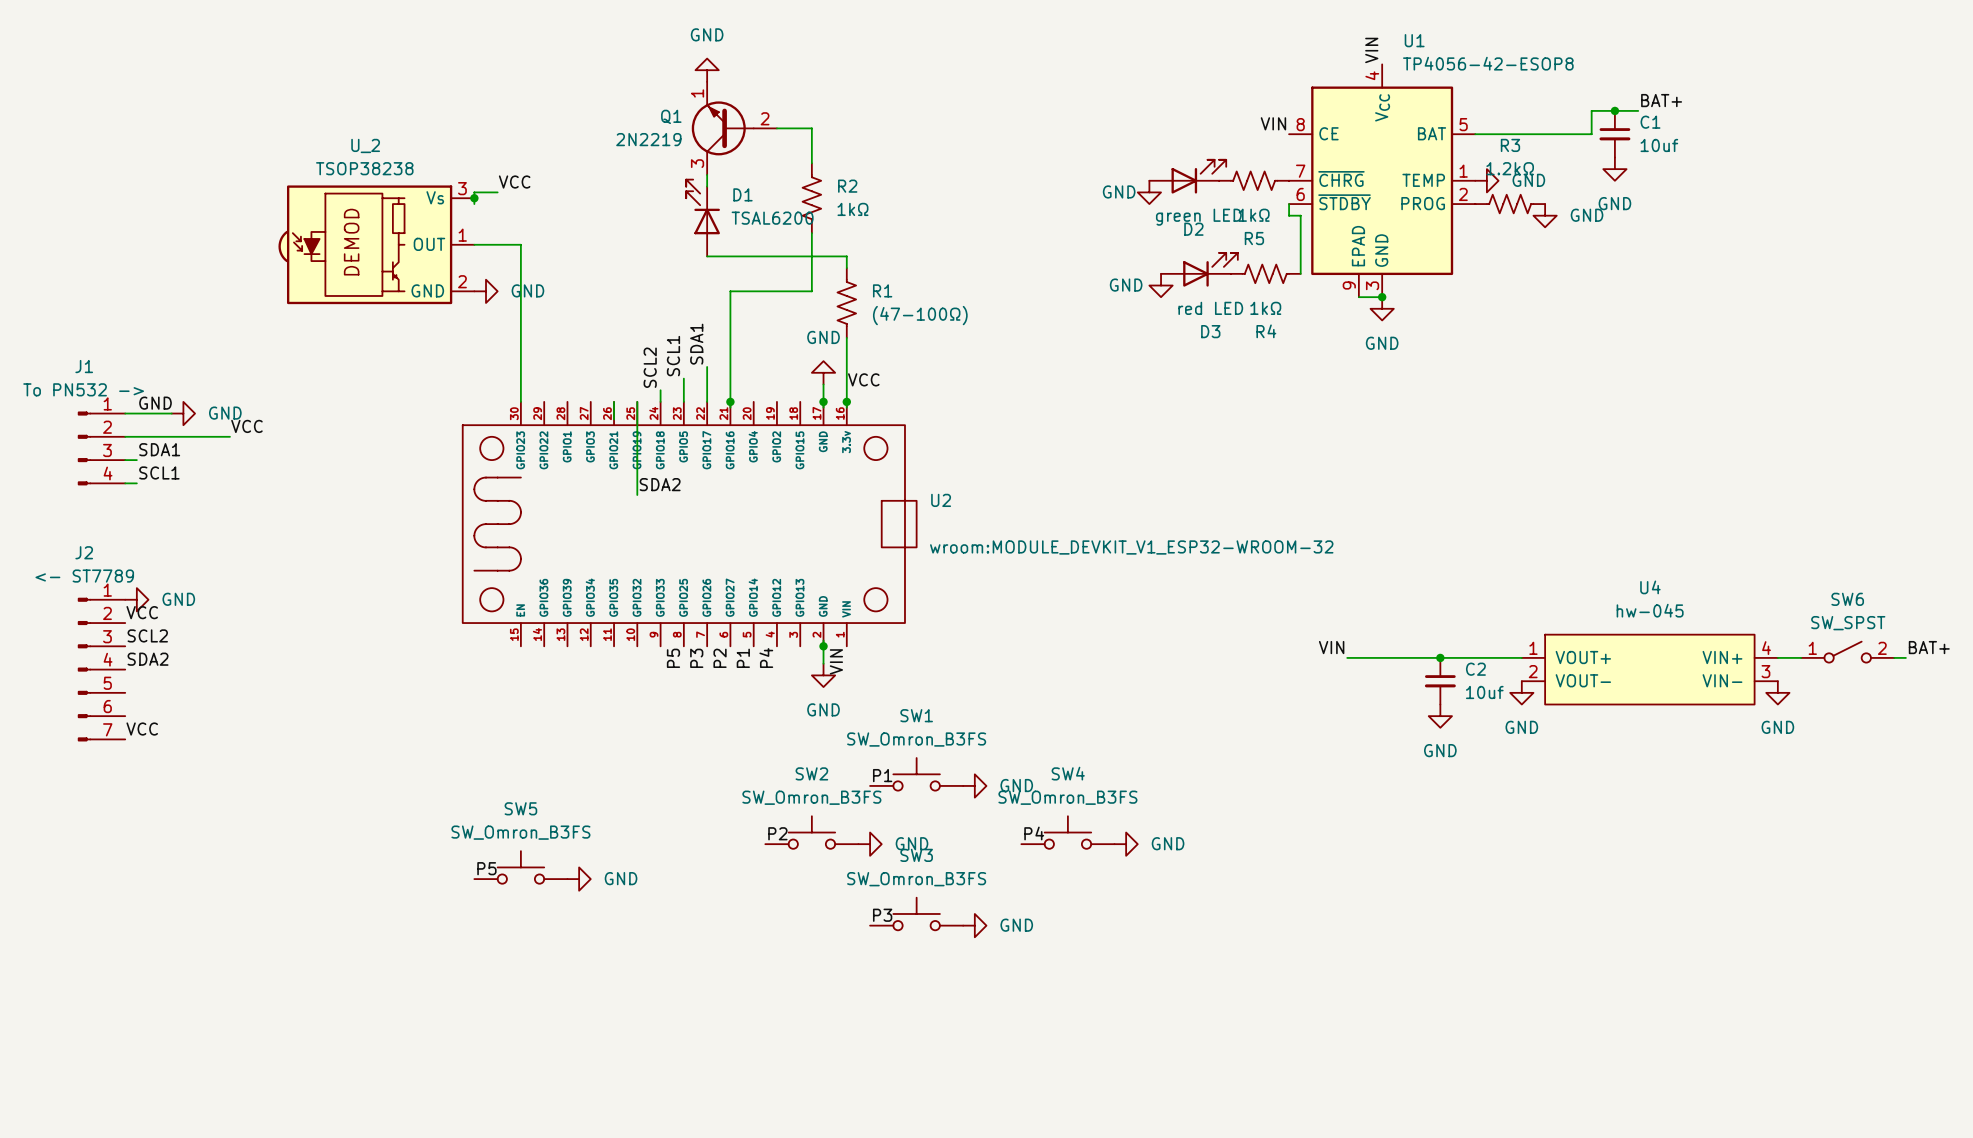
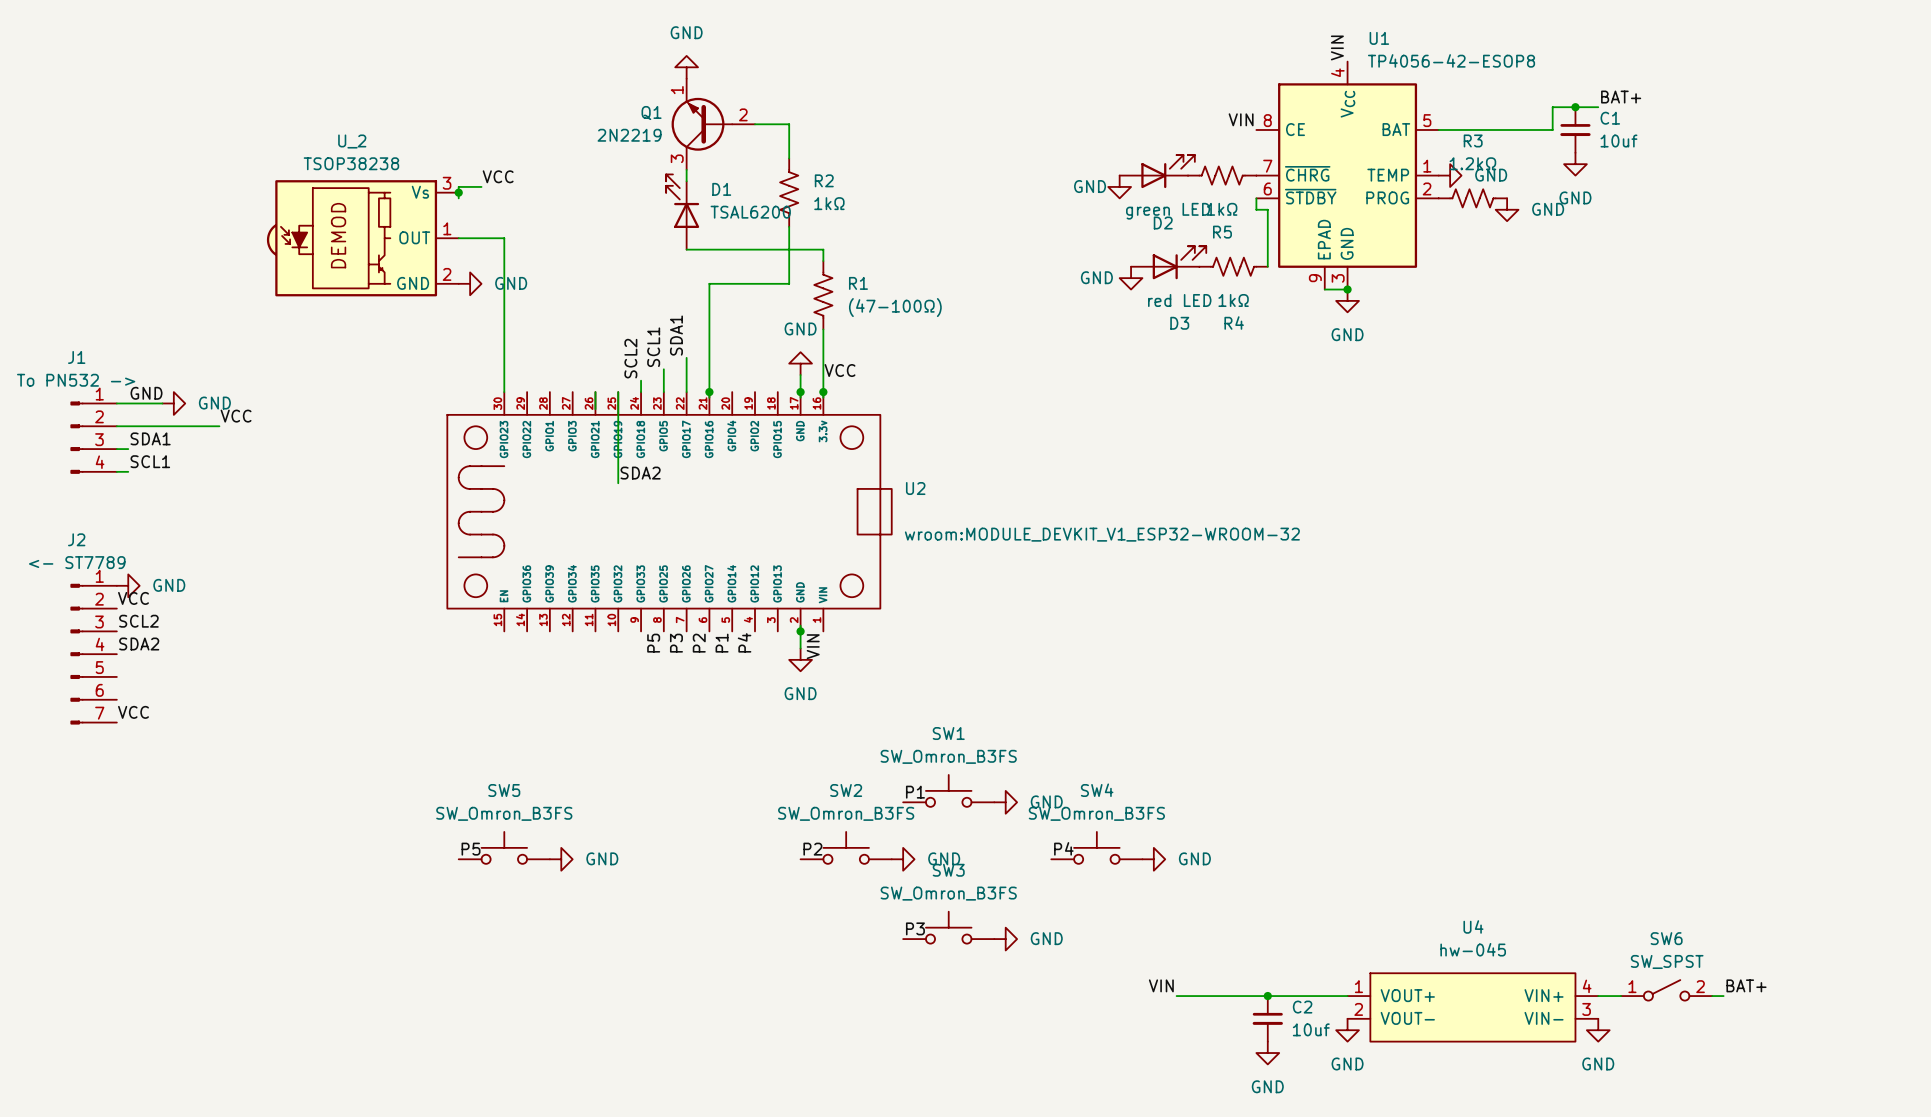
label: VIN (1331, 647) -> none
label: BAT+ (1929, 647) -> none
SW6 position: (1847, 652) -> (1666, 990)
wire: (1347, 657) (1521, 657) -> none
junction: (1440, 657) -> none
wire: (1777, 657) (1801, 657) -> none
wire: (1894, 657) (1905, 657) -> none
U4 position: (1649, 669) -> (1472, 1007)
C2 position: (1440, 681) -> (1267, 1018)
power symbol: GND (1521, 692) -> none
power symbol: GND (1777, 692) -> none
power symbol: GND (1440, 716) -> none
SW1 position: (916, 774) -> (948, 790)
label position: P1 (882, 775) -> P1 (915, 792)
power symbol: GND (974, 785) -> none
power symbol: none -> GND (1005, 802)
SW2 position: (811, 832) -> (846, 847)
SW4 position: (1067, 832) -> (1096, 847)
label position: P2 (777, 833) -> P2 (812, 849)
label position: P4 (1034, 833) -> P4 (1063, 848)
power symbol: GND (870, 844) -> none
power symbol: GND (1126, 844) -> none
power symbol: none -> GND (903, 859)
power symbol: none -> GND (1153, 859)
SW3 position: (916, 913) -> (948, 927)
label position: P3 (882, 915) -> P3 (915, 928)
power symbol: GND (974, 925) -> none
power symbol: none -> GND (1005, 939)
label: none -> VIN (1161, 985)
label: none -> BAT+ (1746, 985)
wire: none -> (1176, 996) (1347, 996)
junction: none -> (1267, 996)
wire: none -> (1598, 996) (1621, 996)
wire: none -> (1712, 996) (1723, 996)
power symbol: none -> GND (1347, 1030)
power symbol: none -> GND (1598, 1030)
power symbol: none -> GND (1267, 1053)

